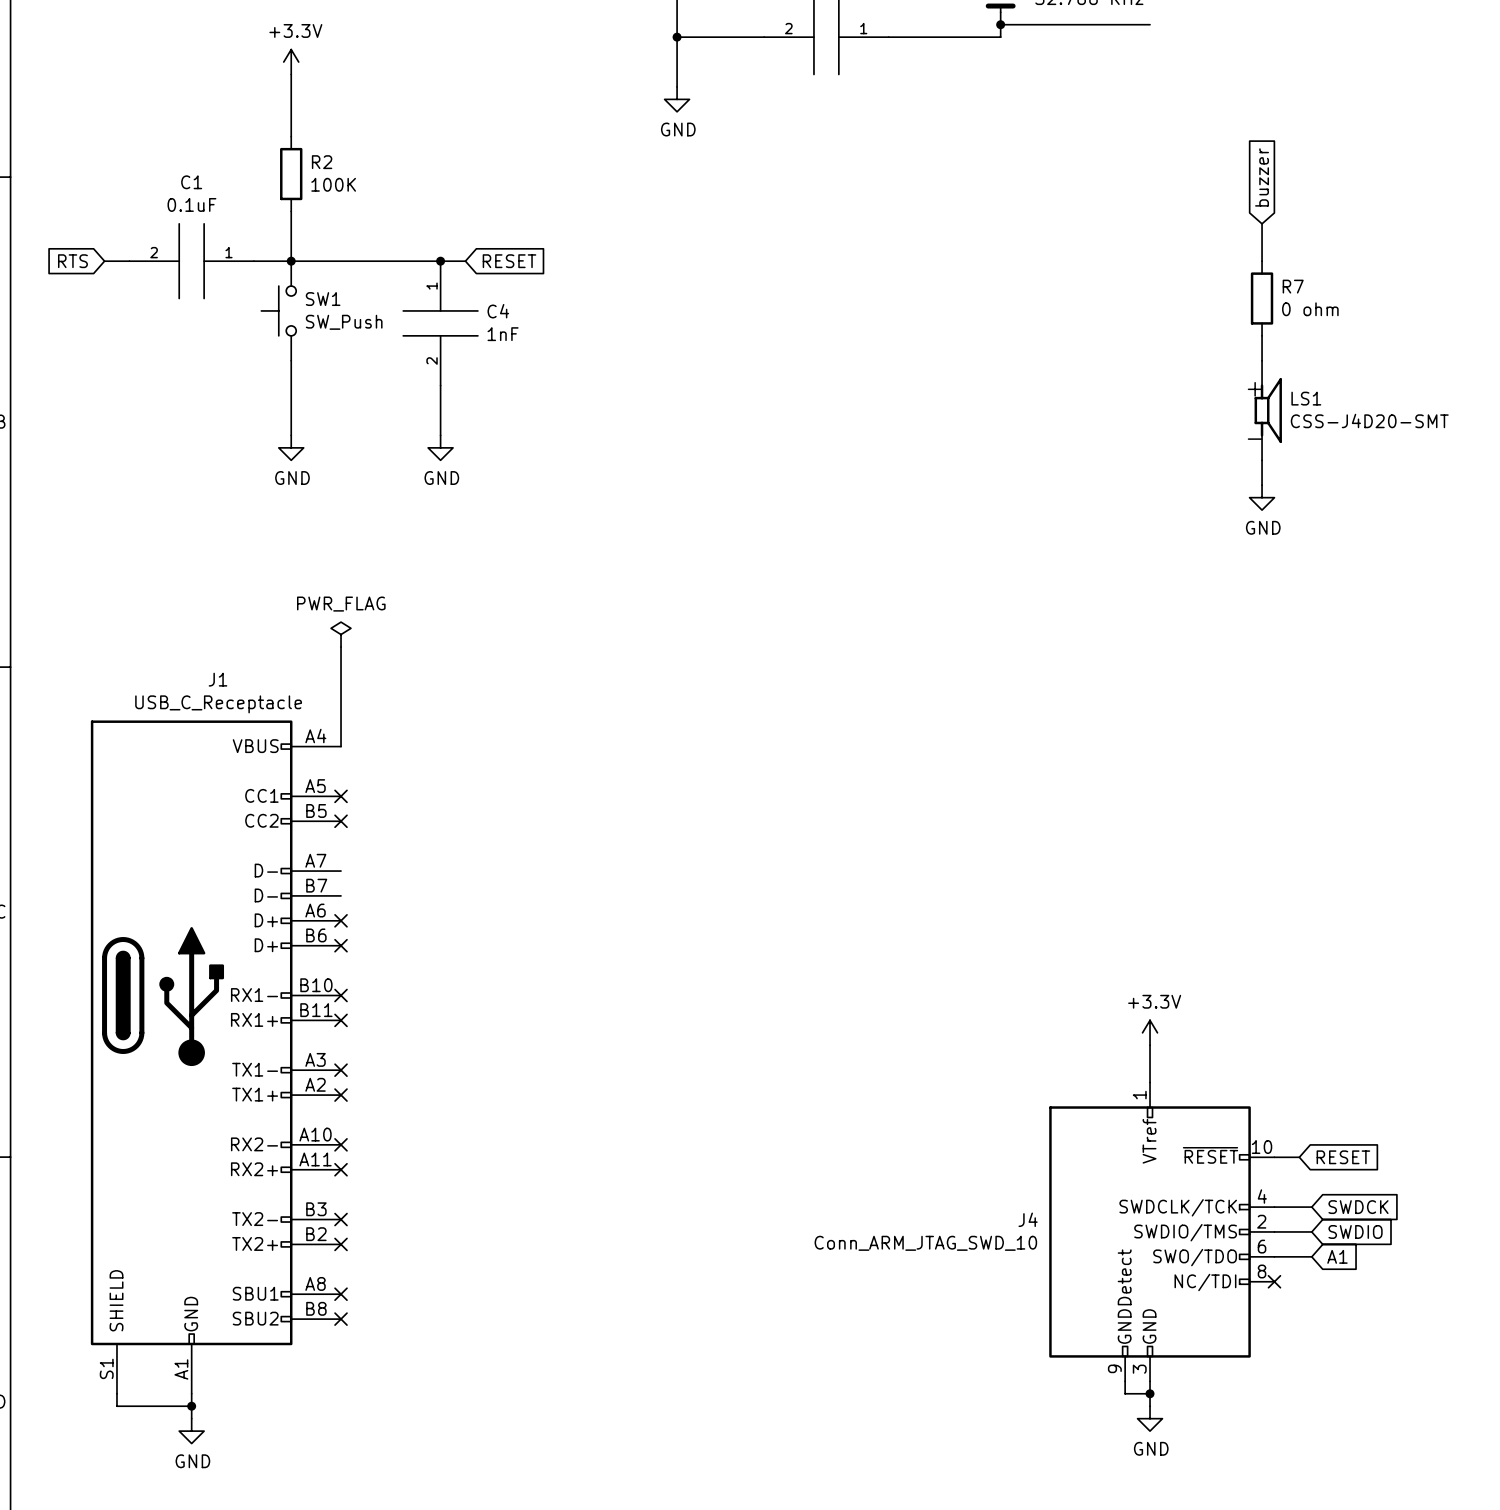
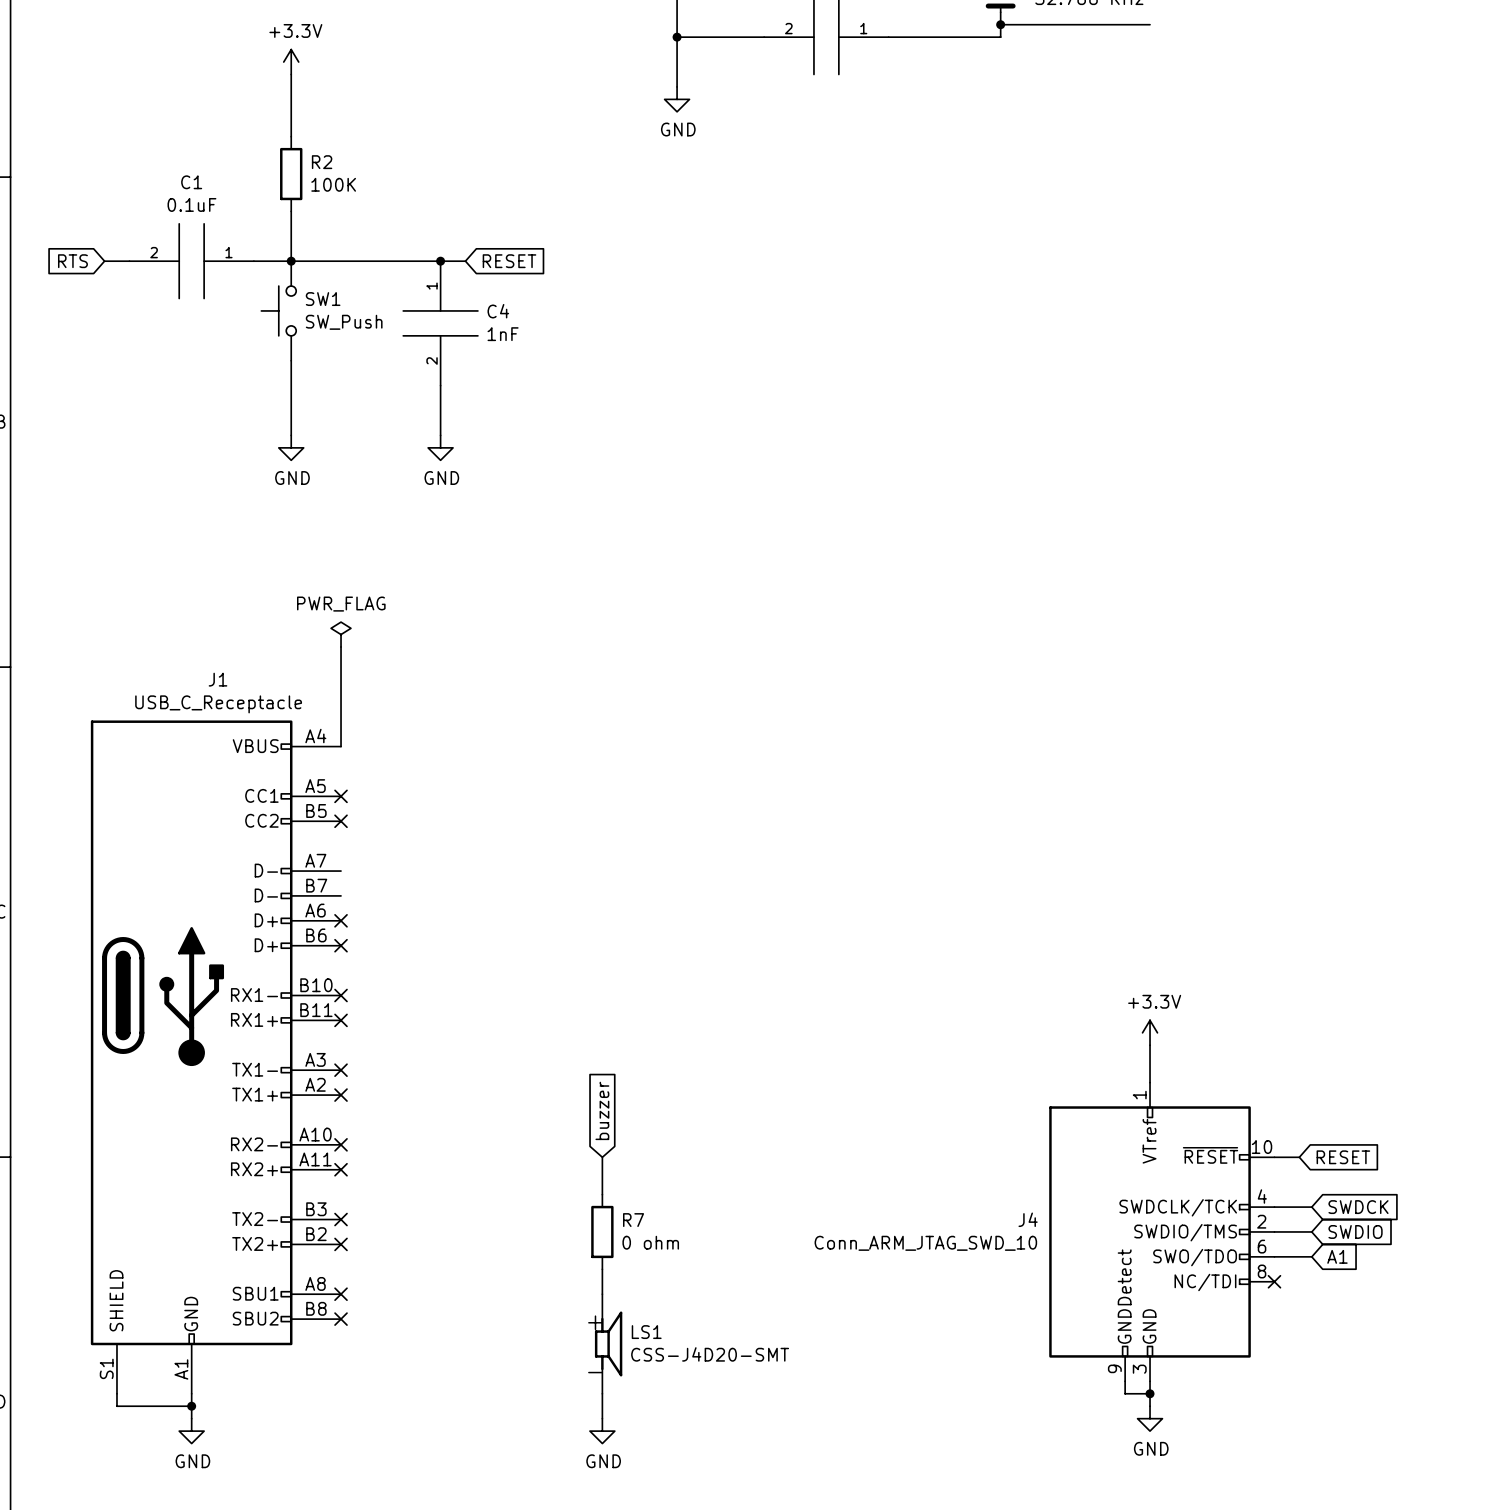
global label: buzzer (1262, 177) -> none
wire: (1262, 223) (1262, 261) -> none
R7 position: (1262, 298) -> (602, 1231)
wire: (1262, 335) (1262, 360) -> none
LS1 position: (1268, 410) -> (608, 1343)
wire: (1262, 460) (1262, 485) -> none
power symbol: GND (1262, 497) -> none
global label: none -> buzzer (602, 1110)
wire: none -> (602, 1157) (602, 1194)
wire: none -> (602, 1269) (602, 1294)
wire: none -> (602, 1393) (602, 1418)
power symbol: none -> GND (602, 1431)

